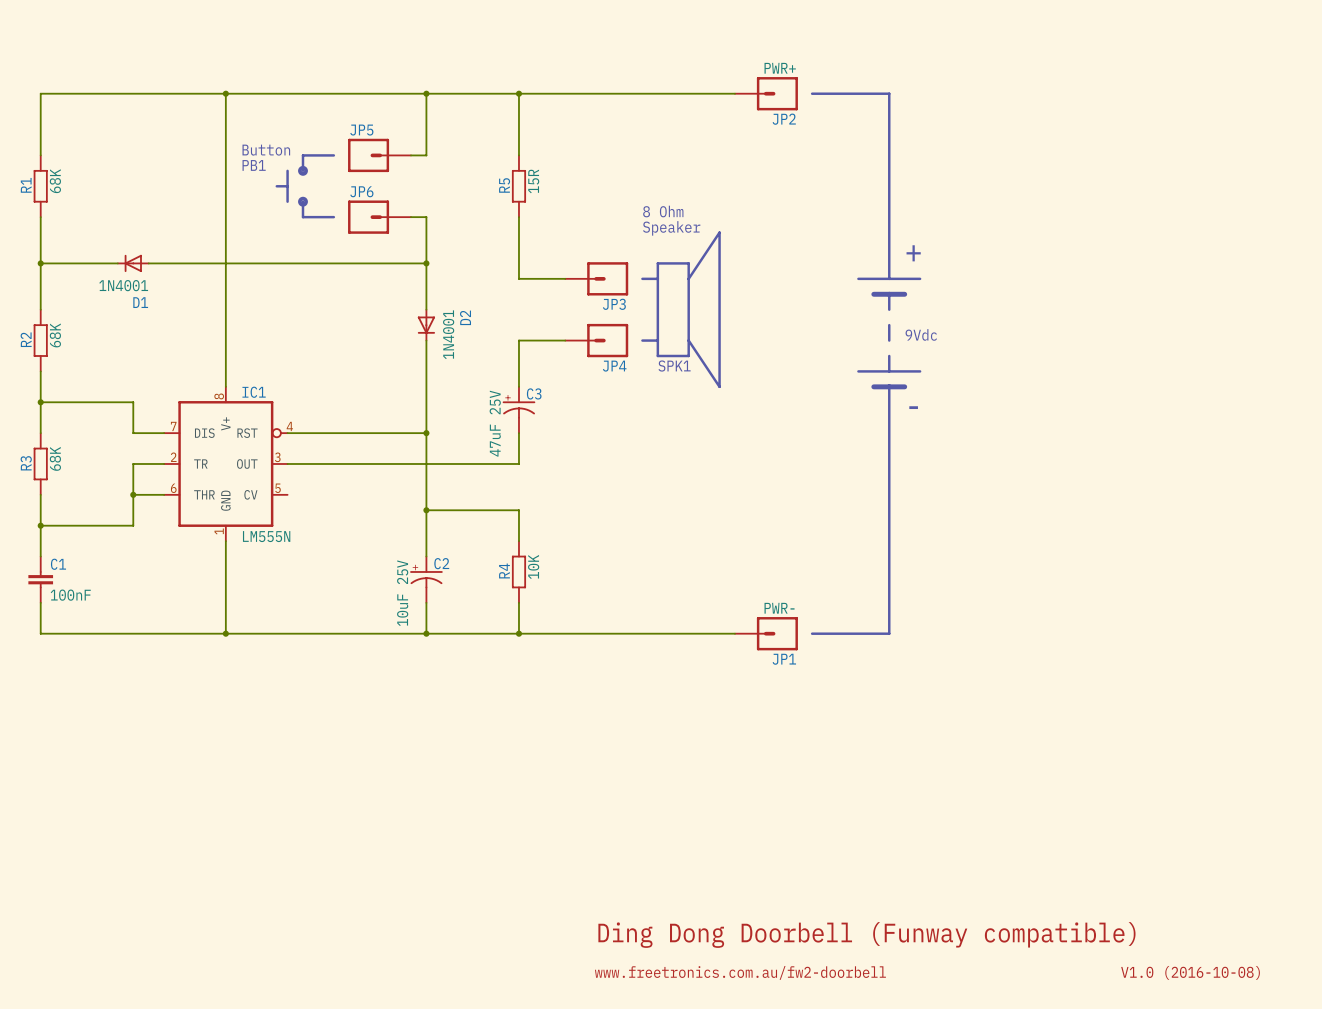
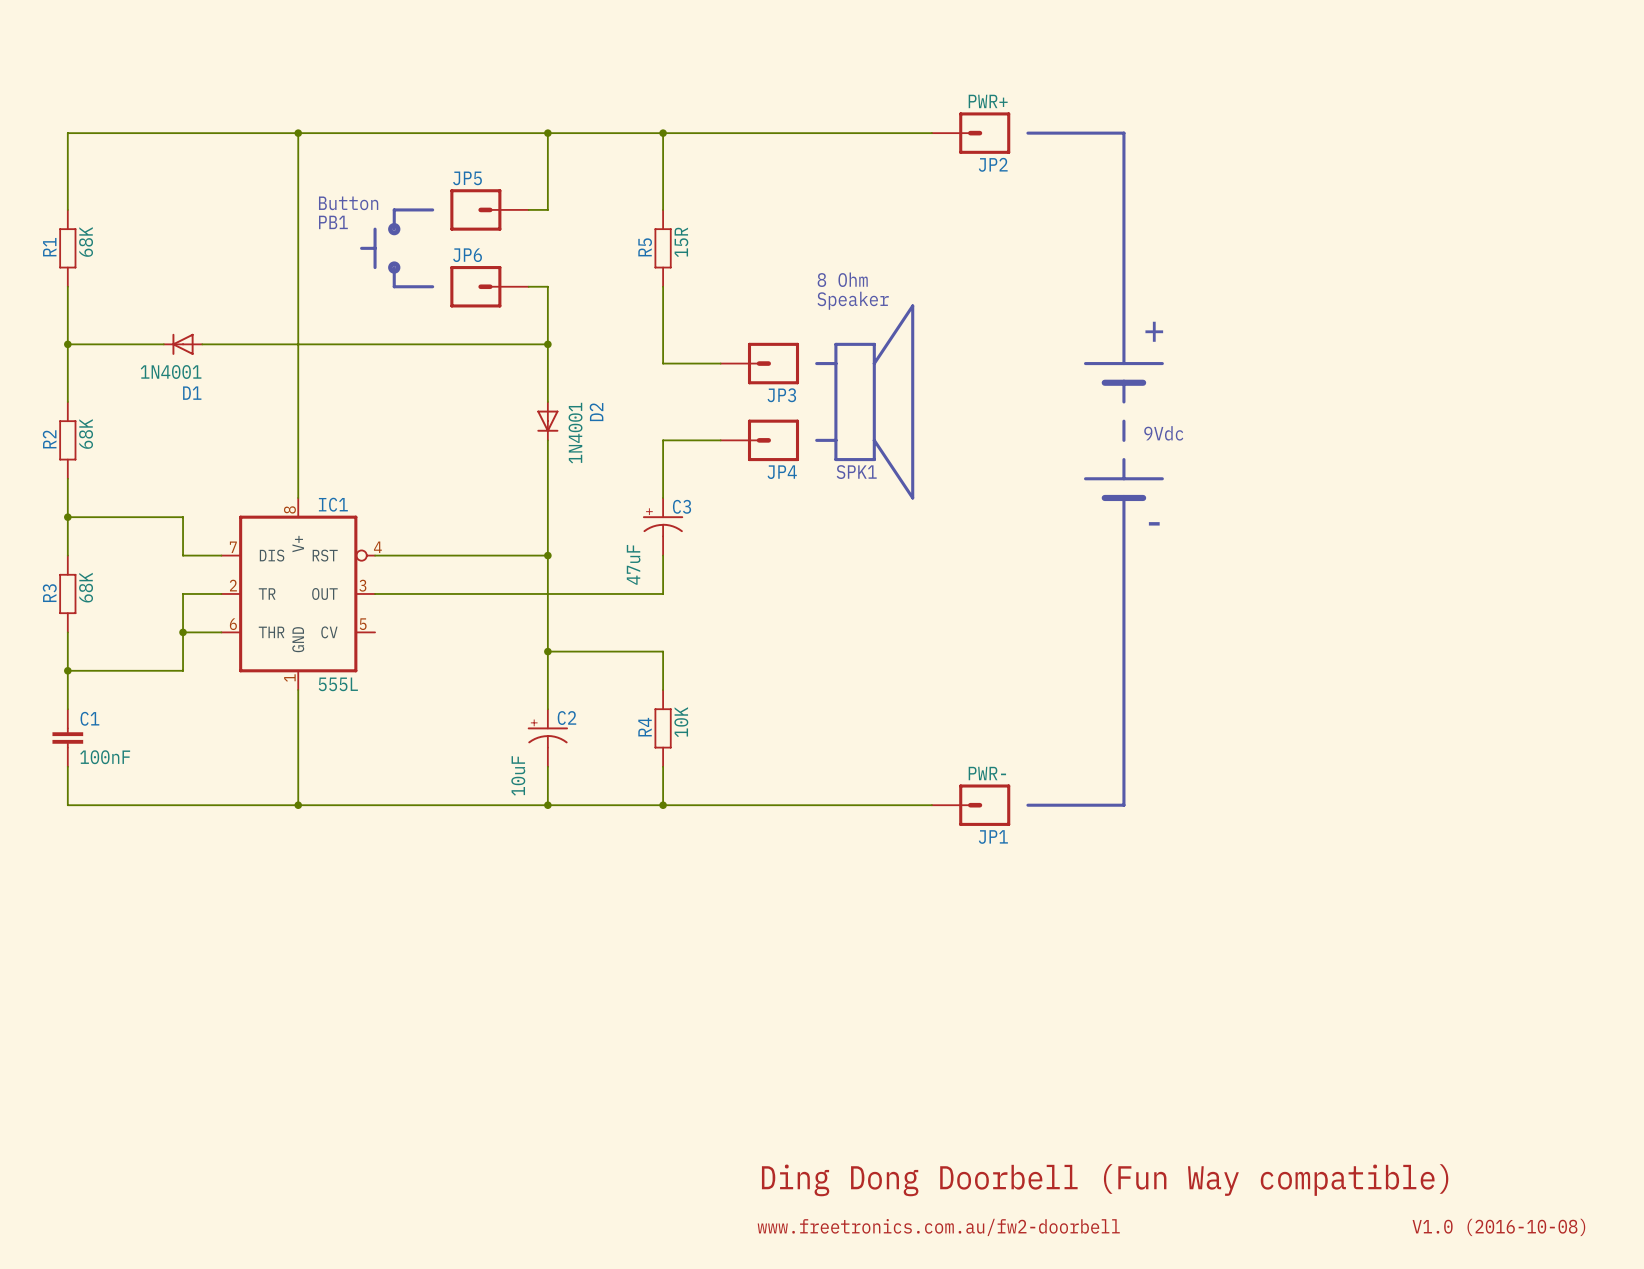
C3 value: 47uF 25V (495, 423) -> 47uF (633, 564)
IC1 value: LM555N (266, 536) -> 555L (338, 684)
C2 value: 10uF 25V (402, 593) -> 10uF (518, 775)
text: Ding Dong Doorbell (Funway compatible) (866, 934) -> Ding Dong Doorbell (Fun Way compatible) (1105, 1180)

